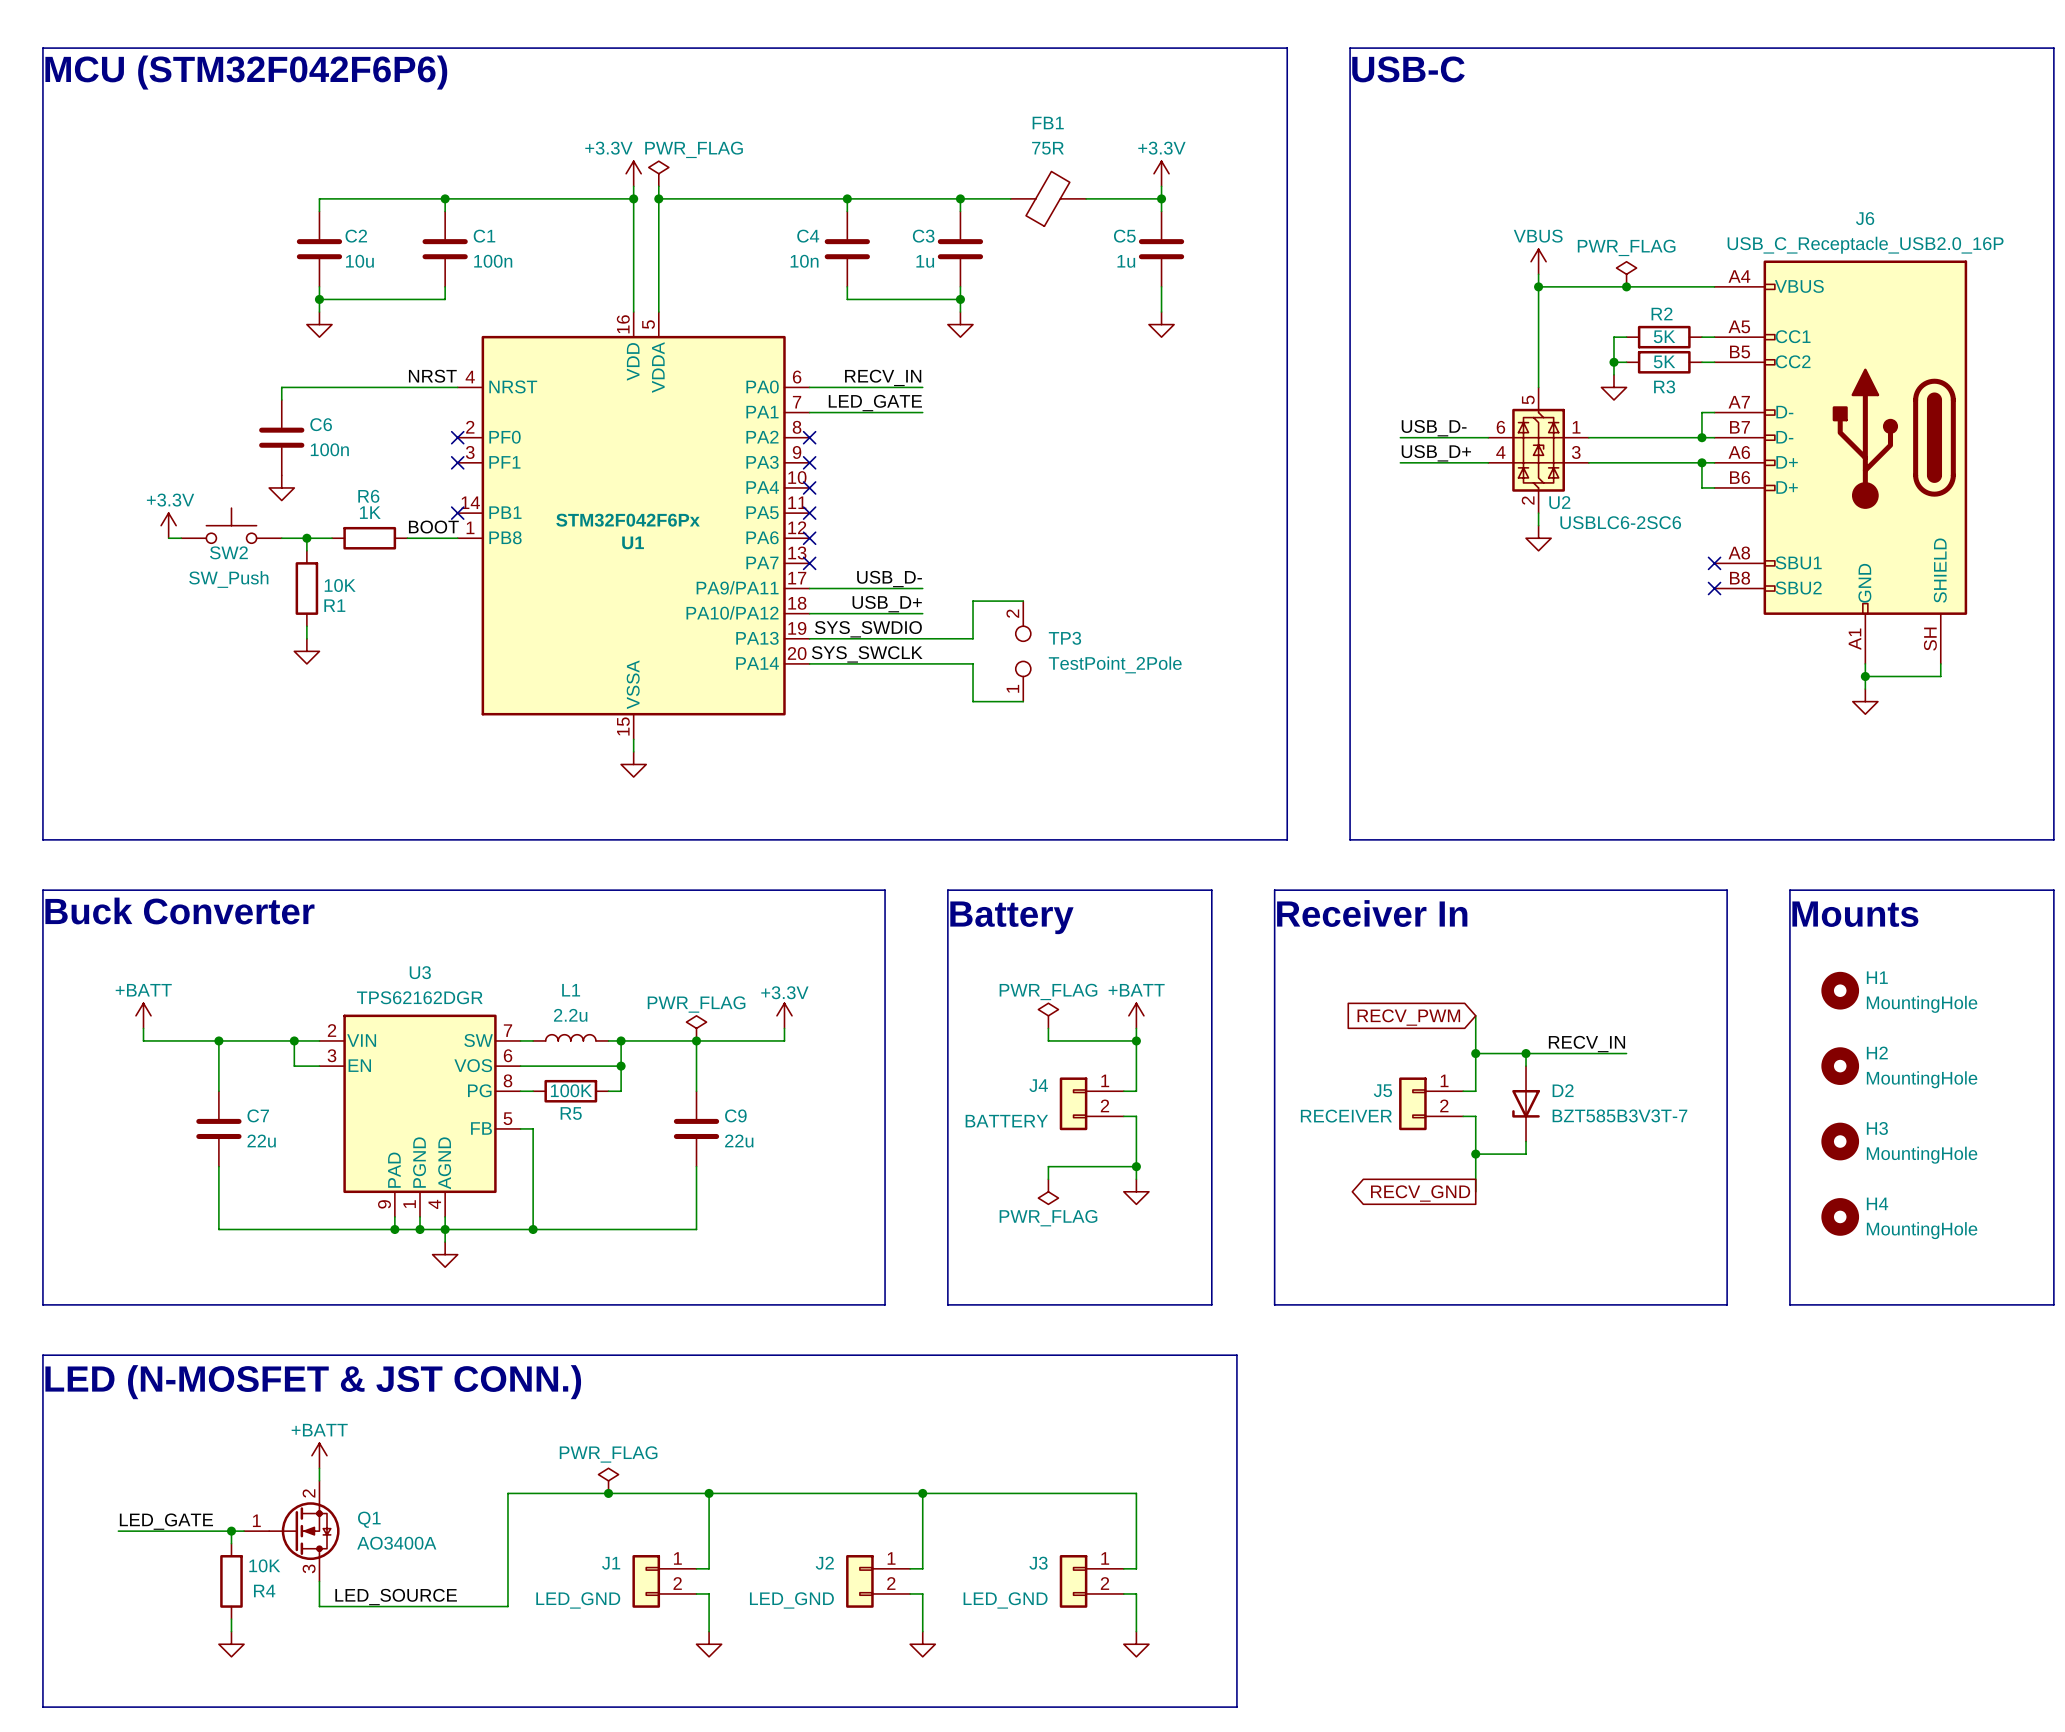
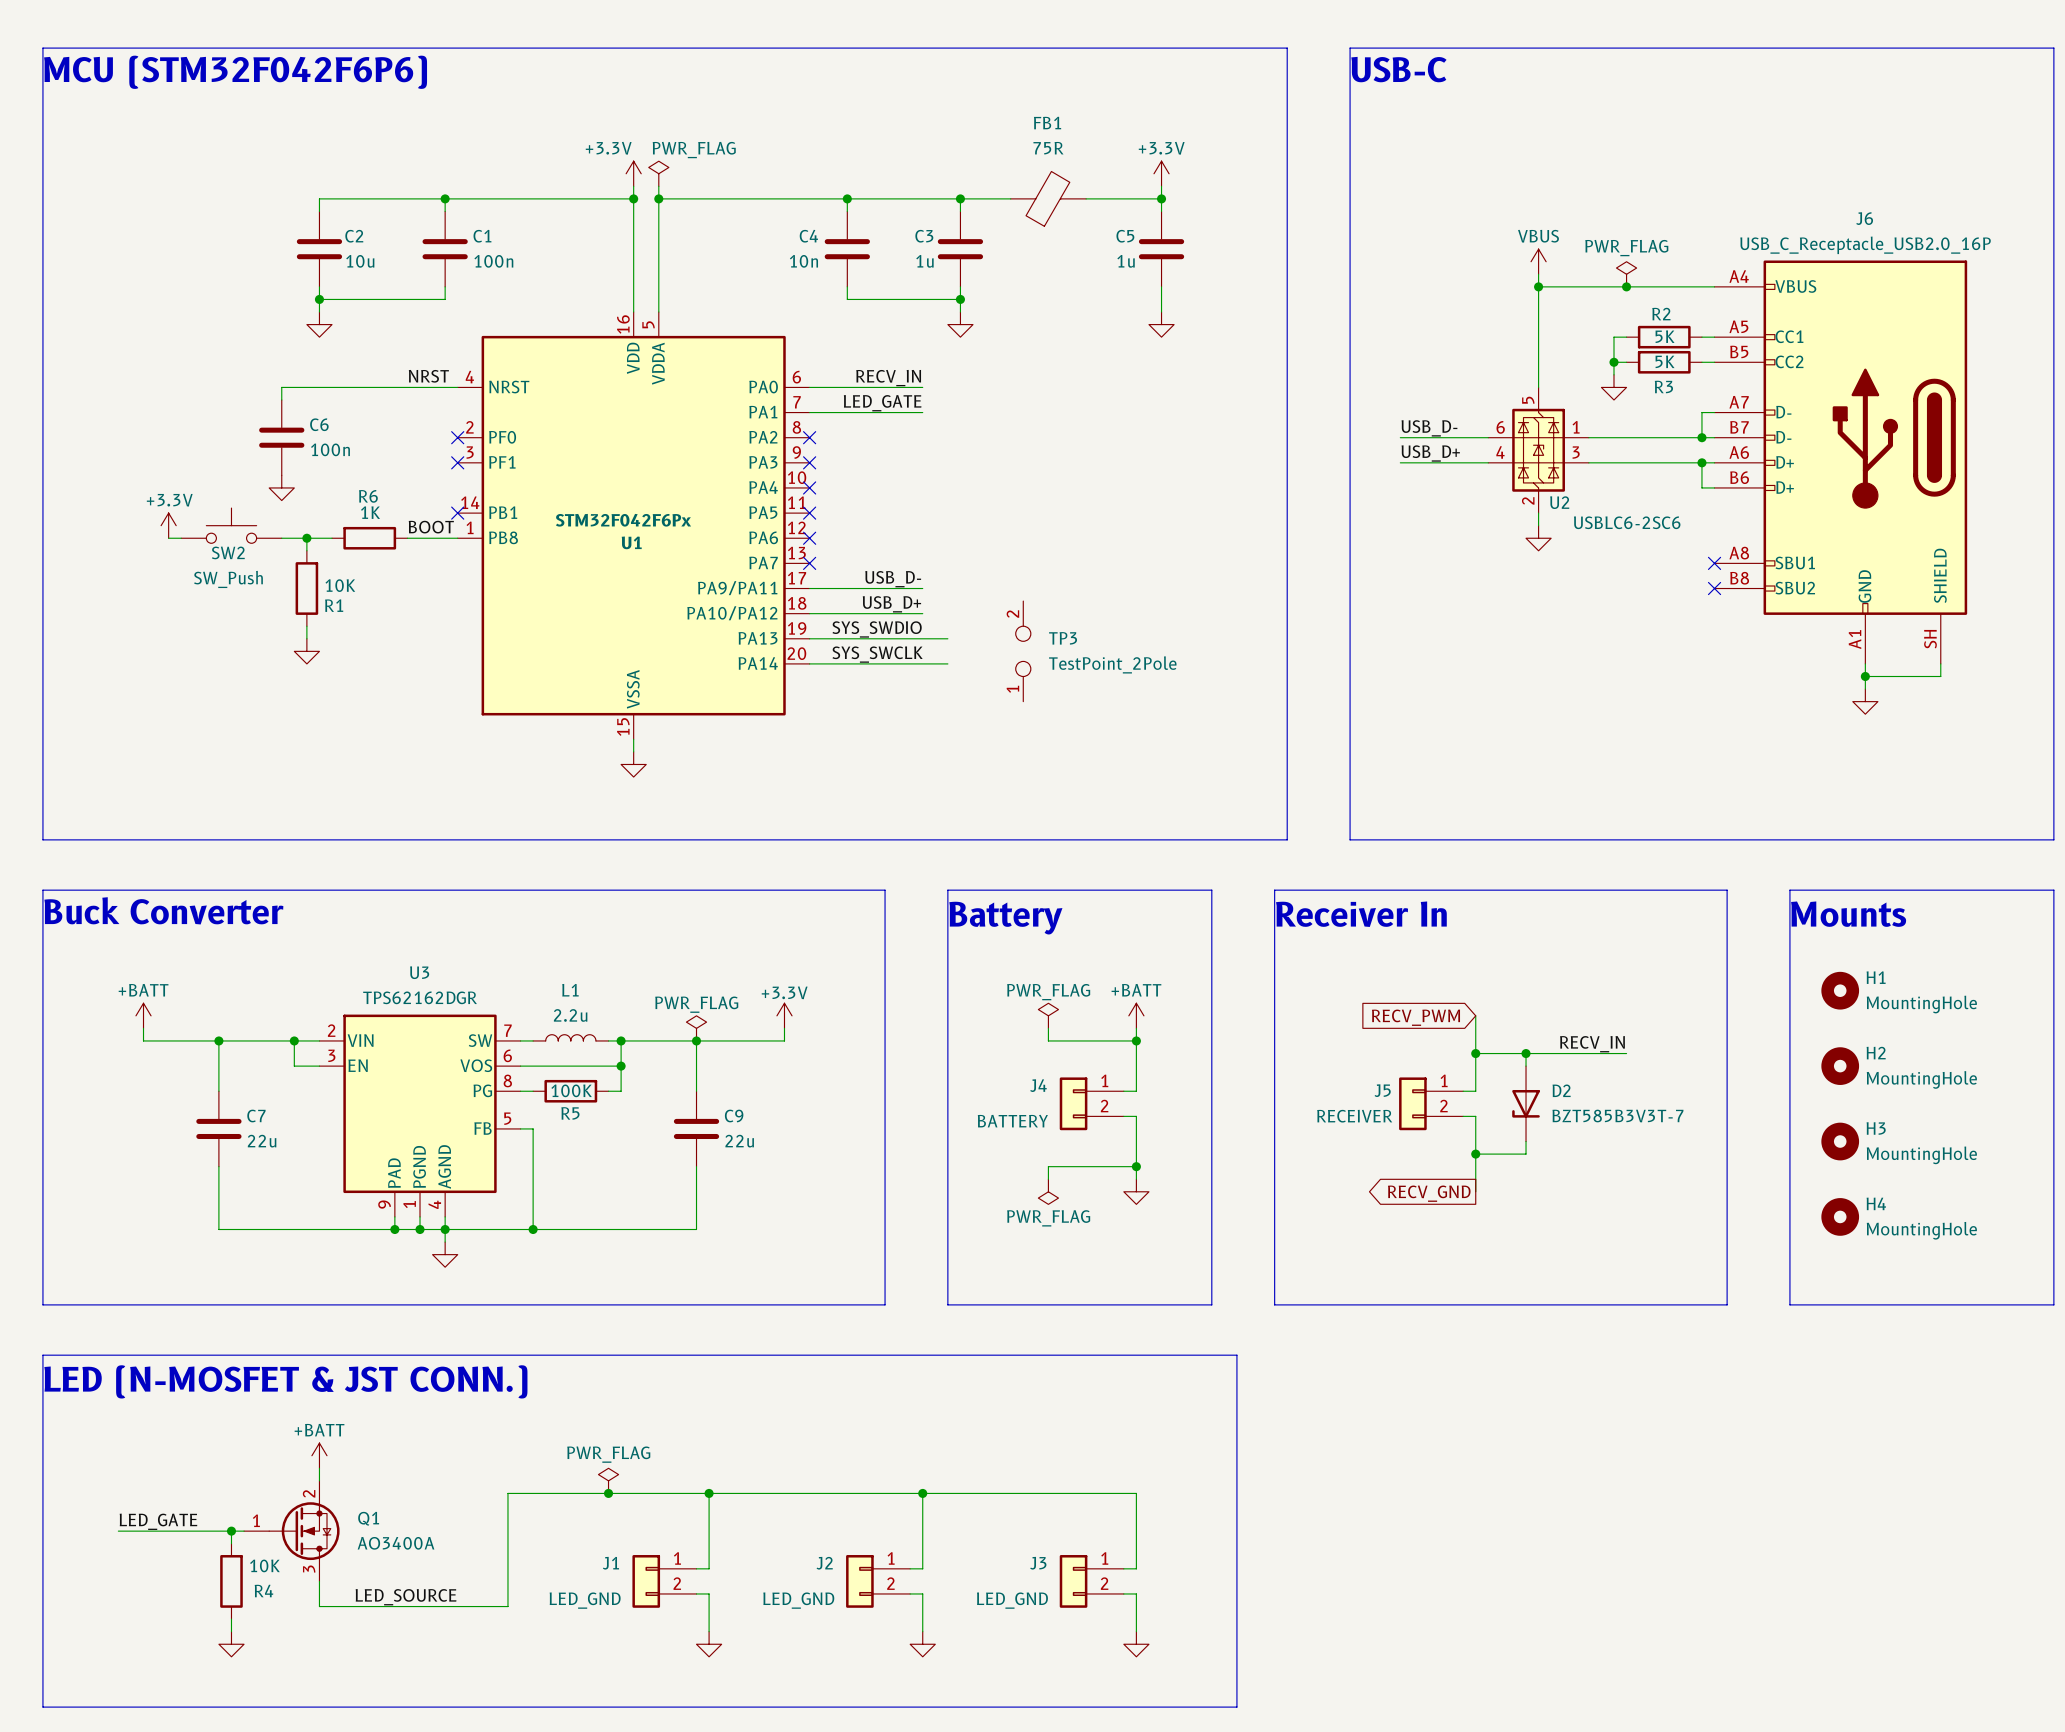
wire: (1023, 601) (973, 601) (973, 638) (947, 638) -> none
wire: (947, 663) (973, 663) (973, 701) (1023, 701) -> none

